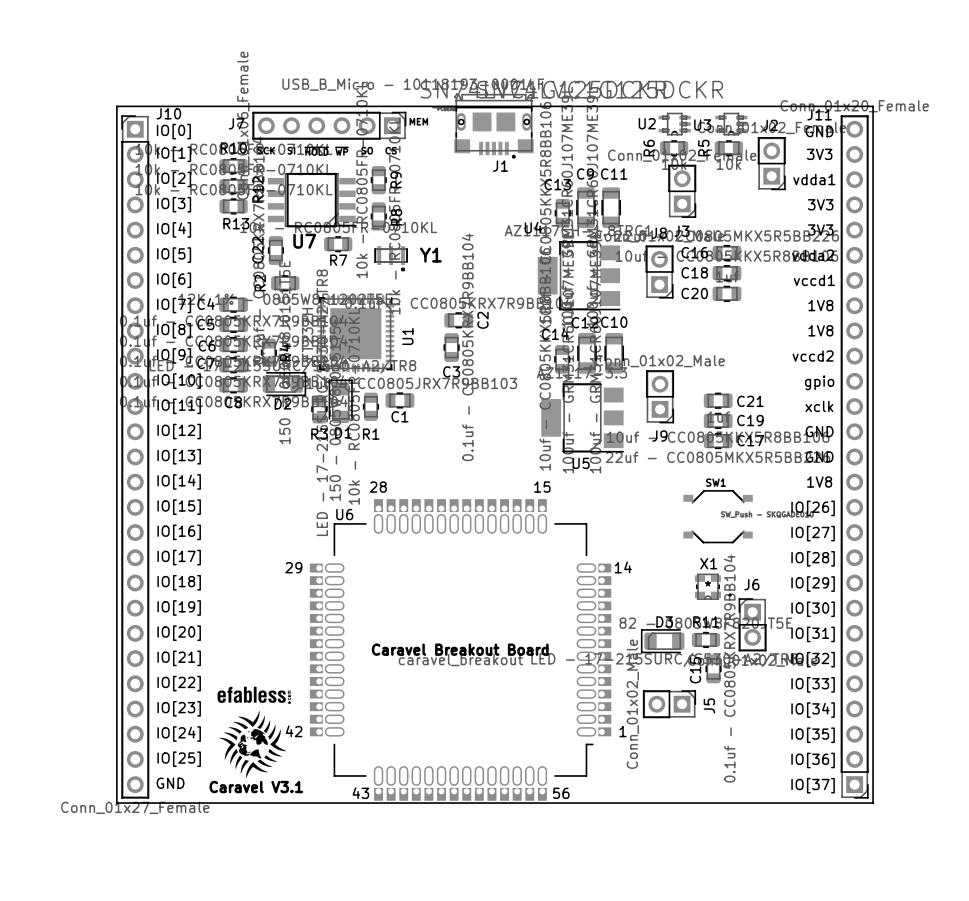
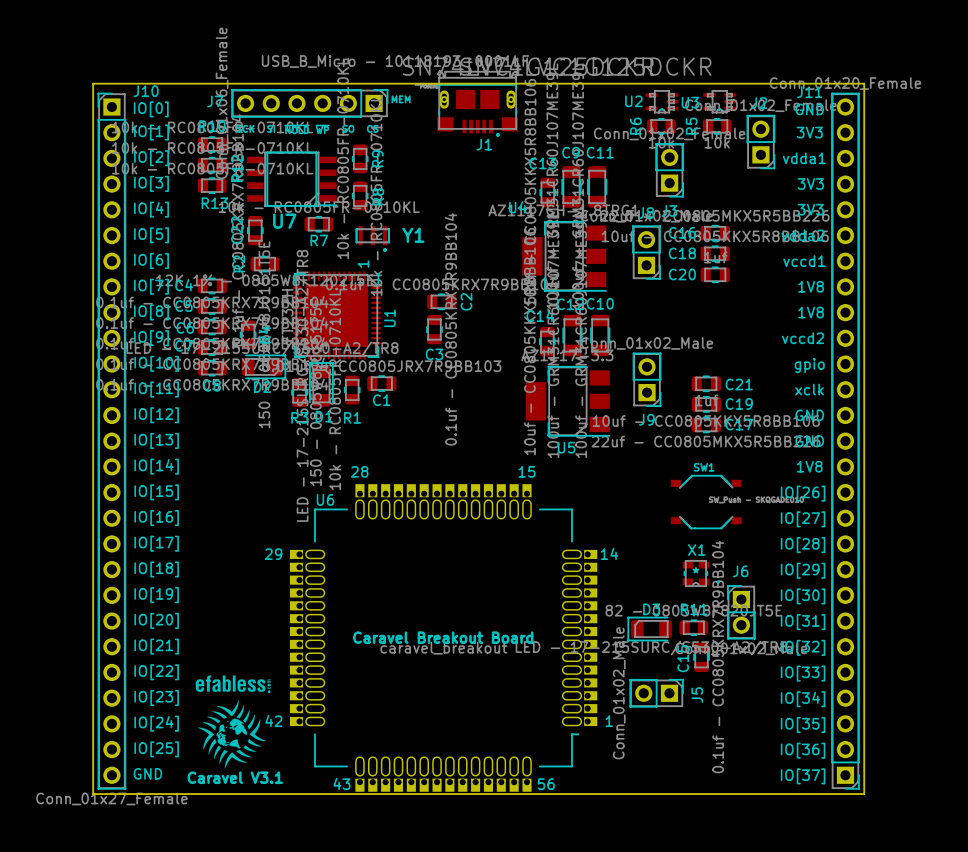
text: none -> 1 (363, 264)
U1 footprint: [317, 295, 395, 373] -> [292, 271, 381, 360]

